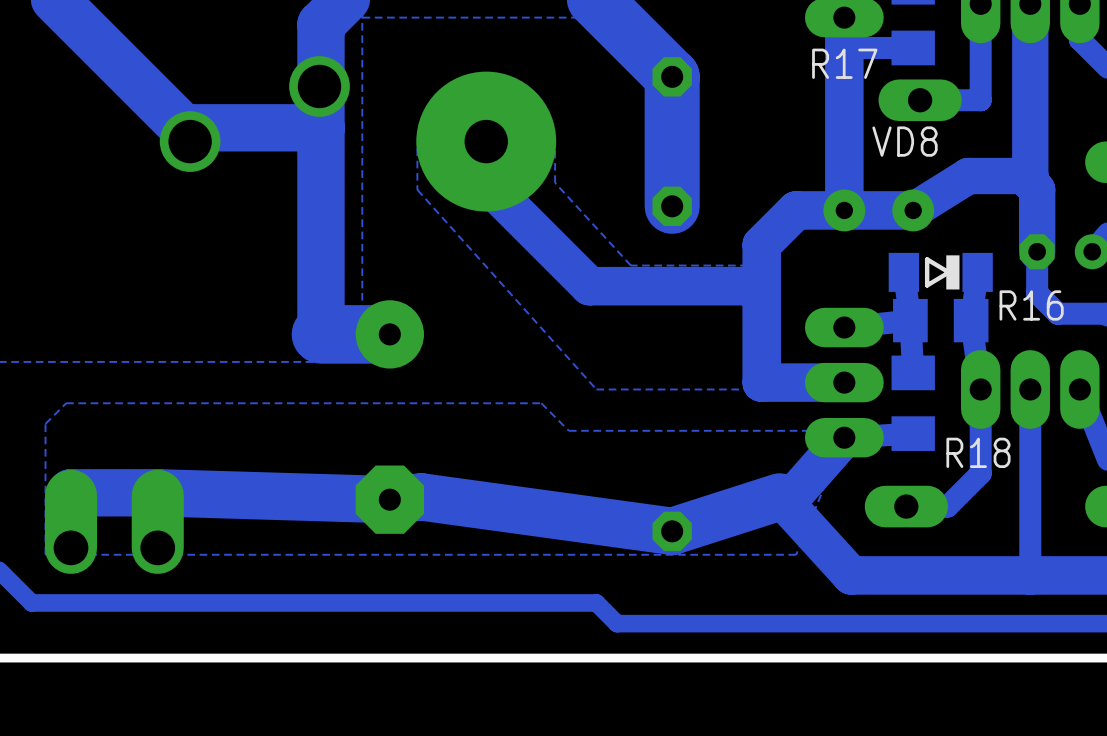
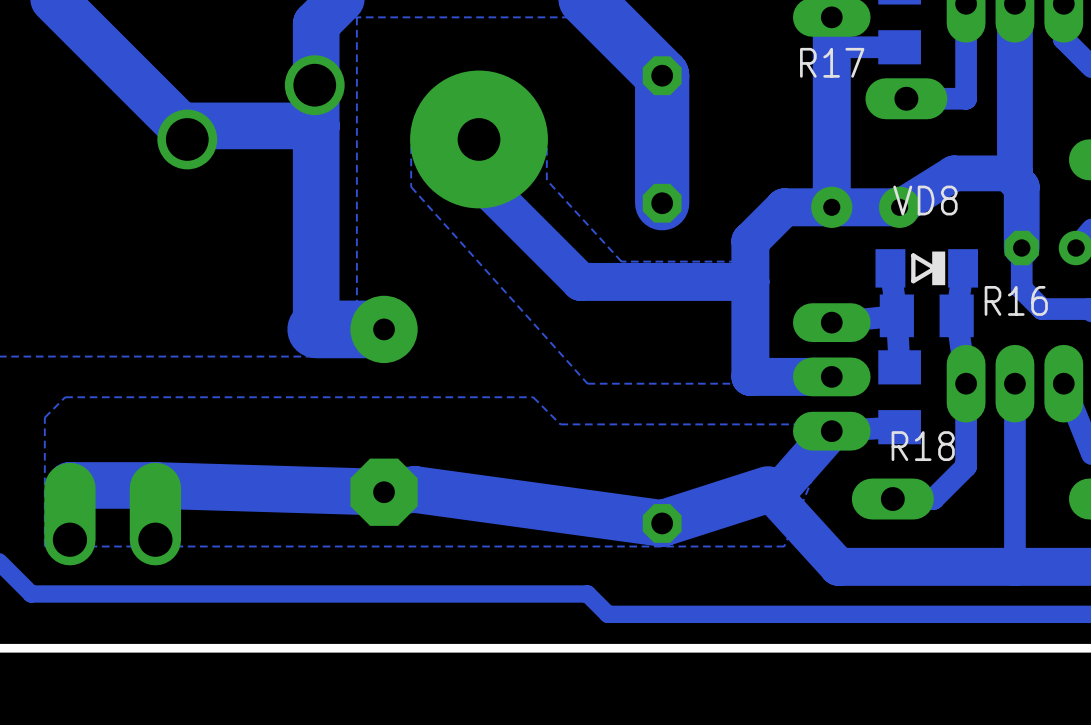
VD8 name position: VD8 (905, 141) -> VD8 (925, 200)
R18 name position: R18 (978, 452) -> R18 (923, 446)

